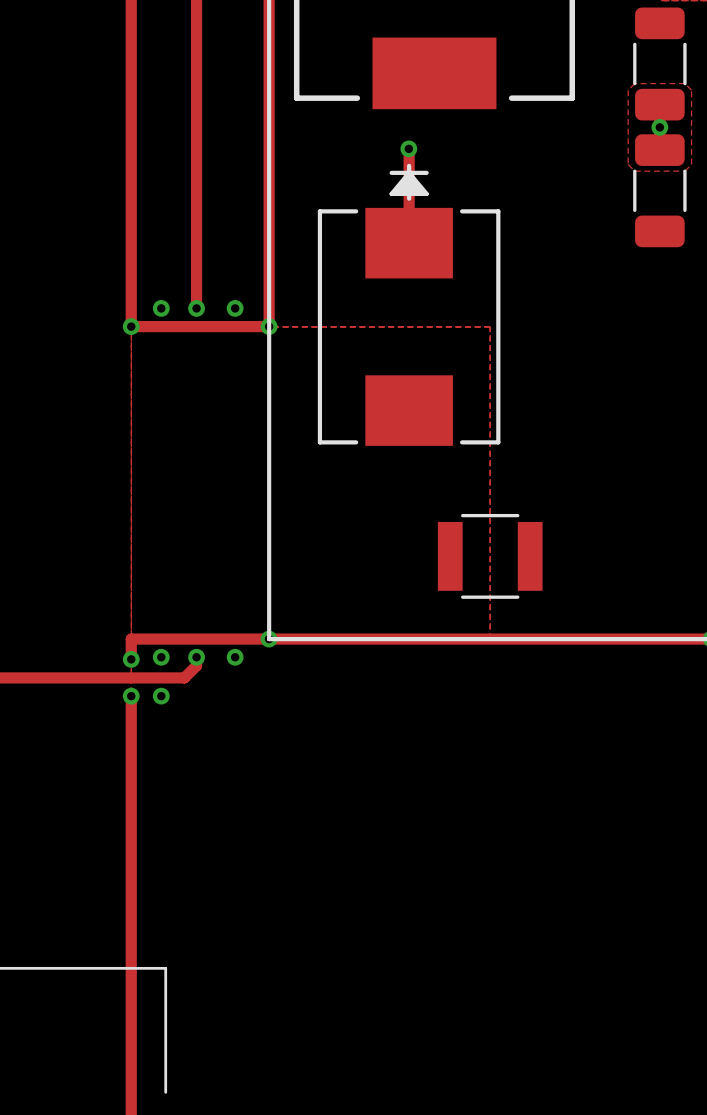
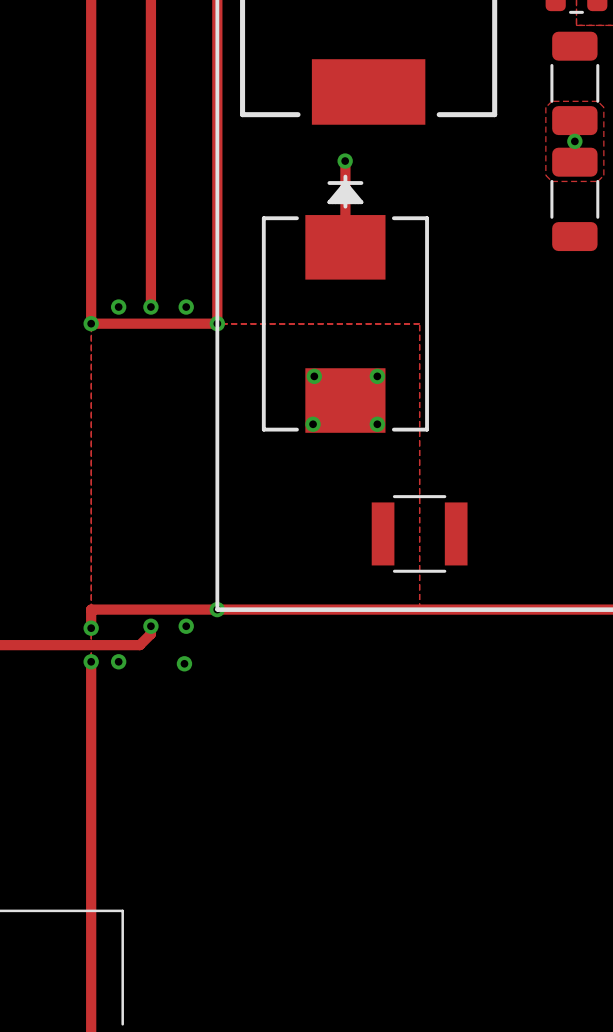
via: none -> (314, 376)
via: none -> (377, 376)
via: none -> (313, 424)
via: none -> (377, 424)
via position: (161, 657) -> (184, 663)

